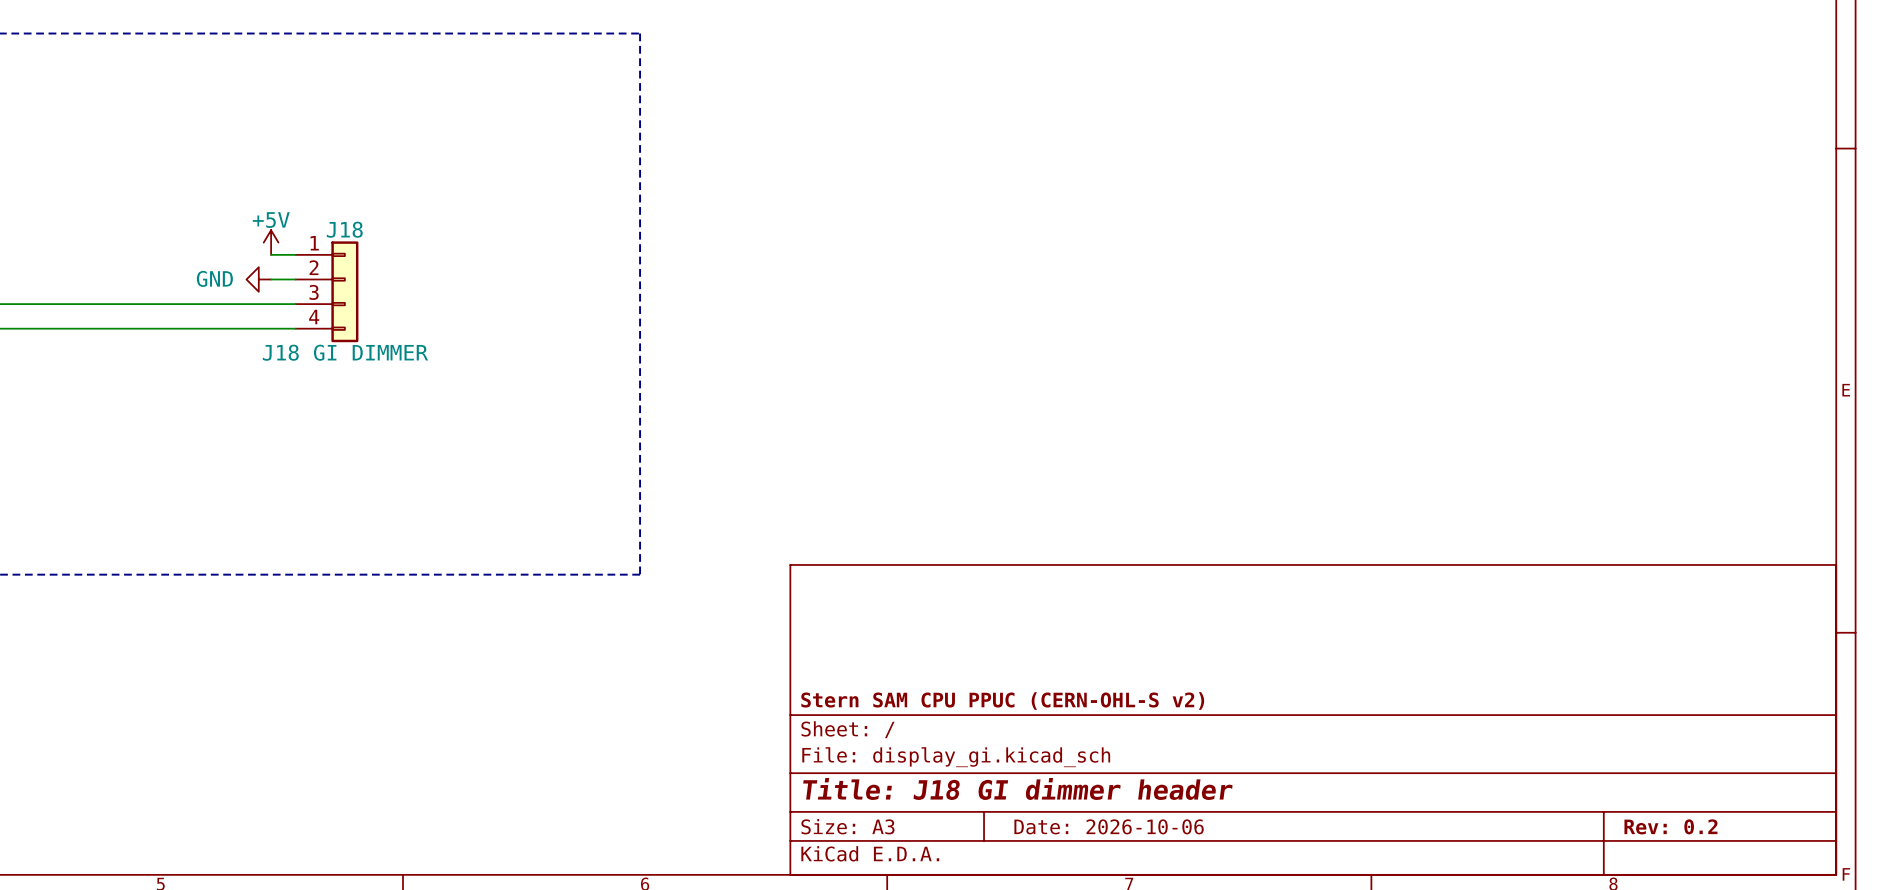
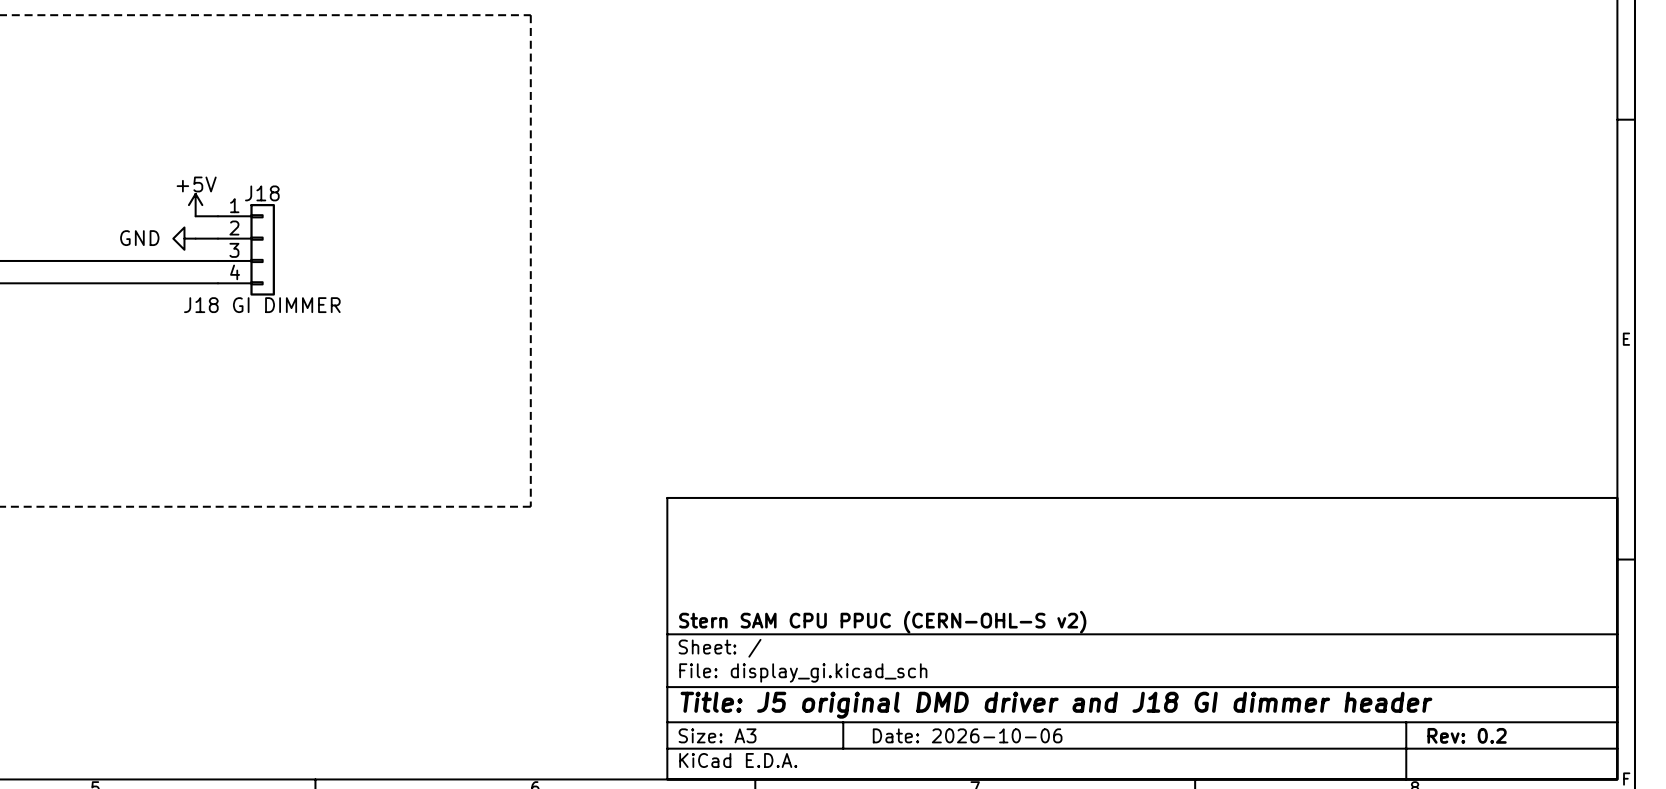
title block: Title: J18 GI dimmer header (1017, 788) -> Title: J5 original DMD driver and J18 GI dimmer header (1056, 705)

